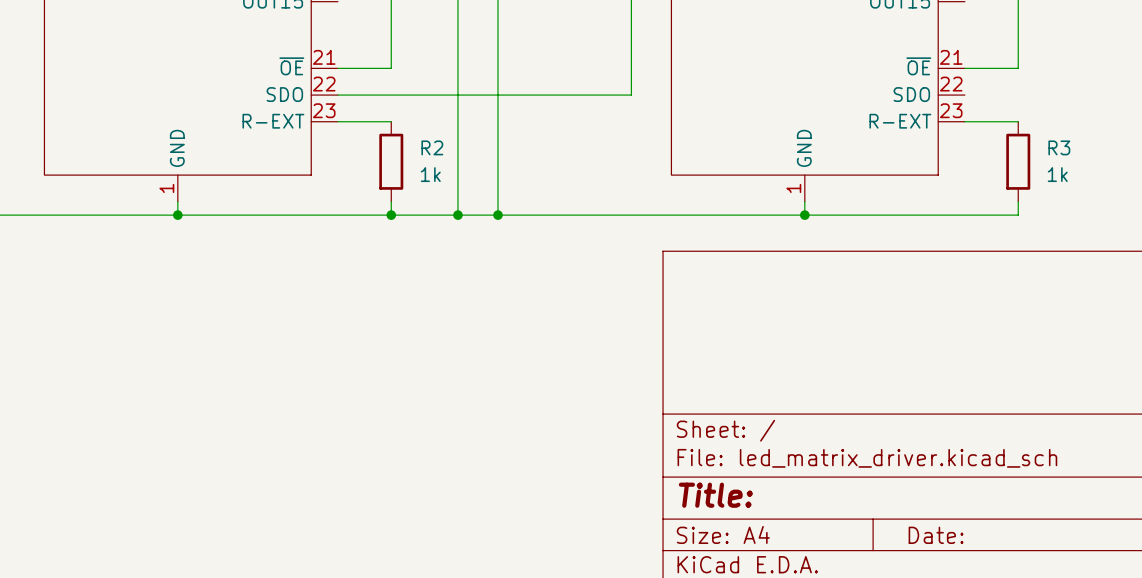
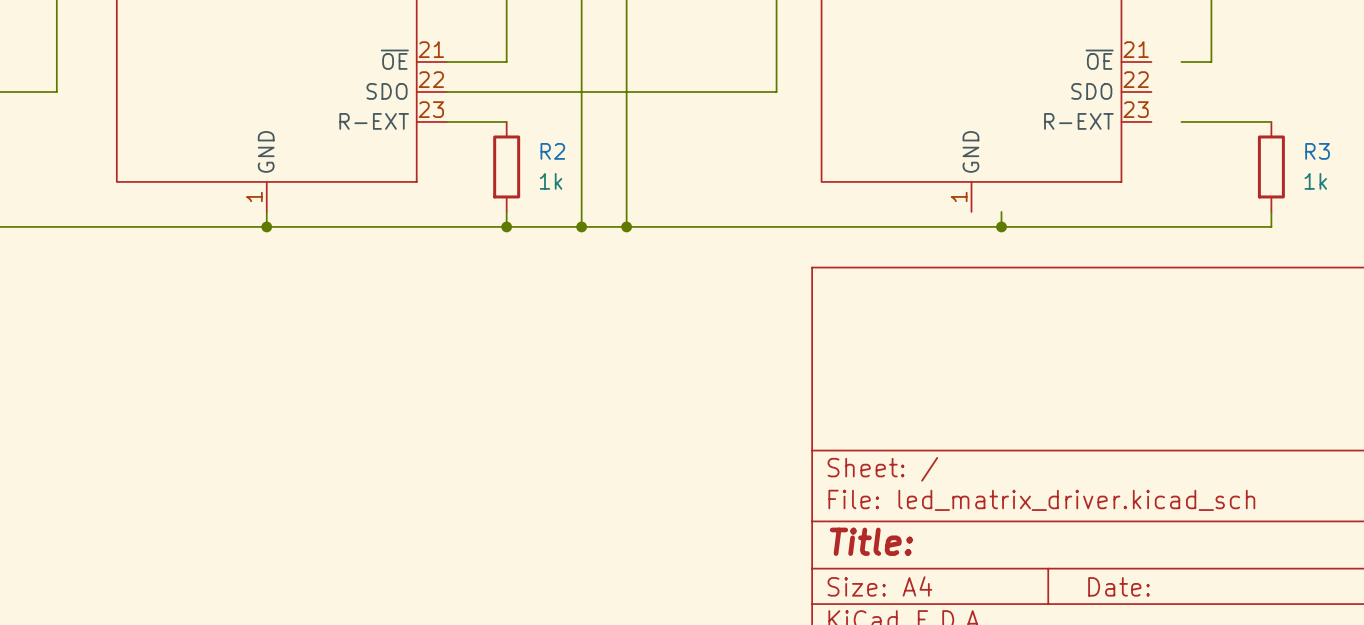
wire: (964, 68) (991, 68) -> none
wire: (964, 121) (991, 121) -> none
wire: none -> (1211, 121) (1271, 121)
R3 position: (1018, 161) -> (1271, 166)
wire: (804, 201) (804, 215) -> (1001, 211) (1001, 226)
wire: (1018, 201) (1018, 215) -> (1271, 211) (1271, 226) (1211, 226)
junction position: (804, 215) -> (1001, 226)

